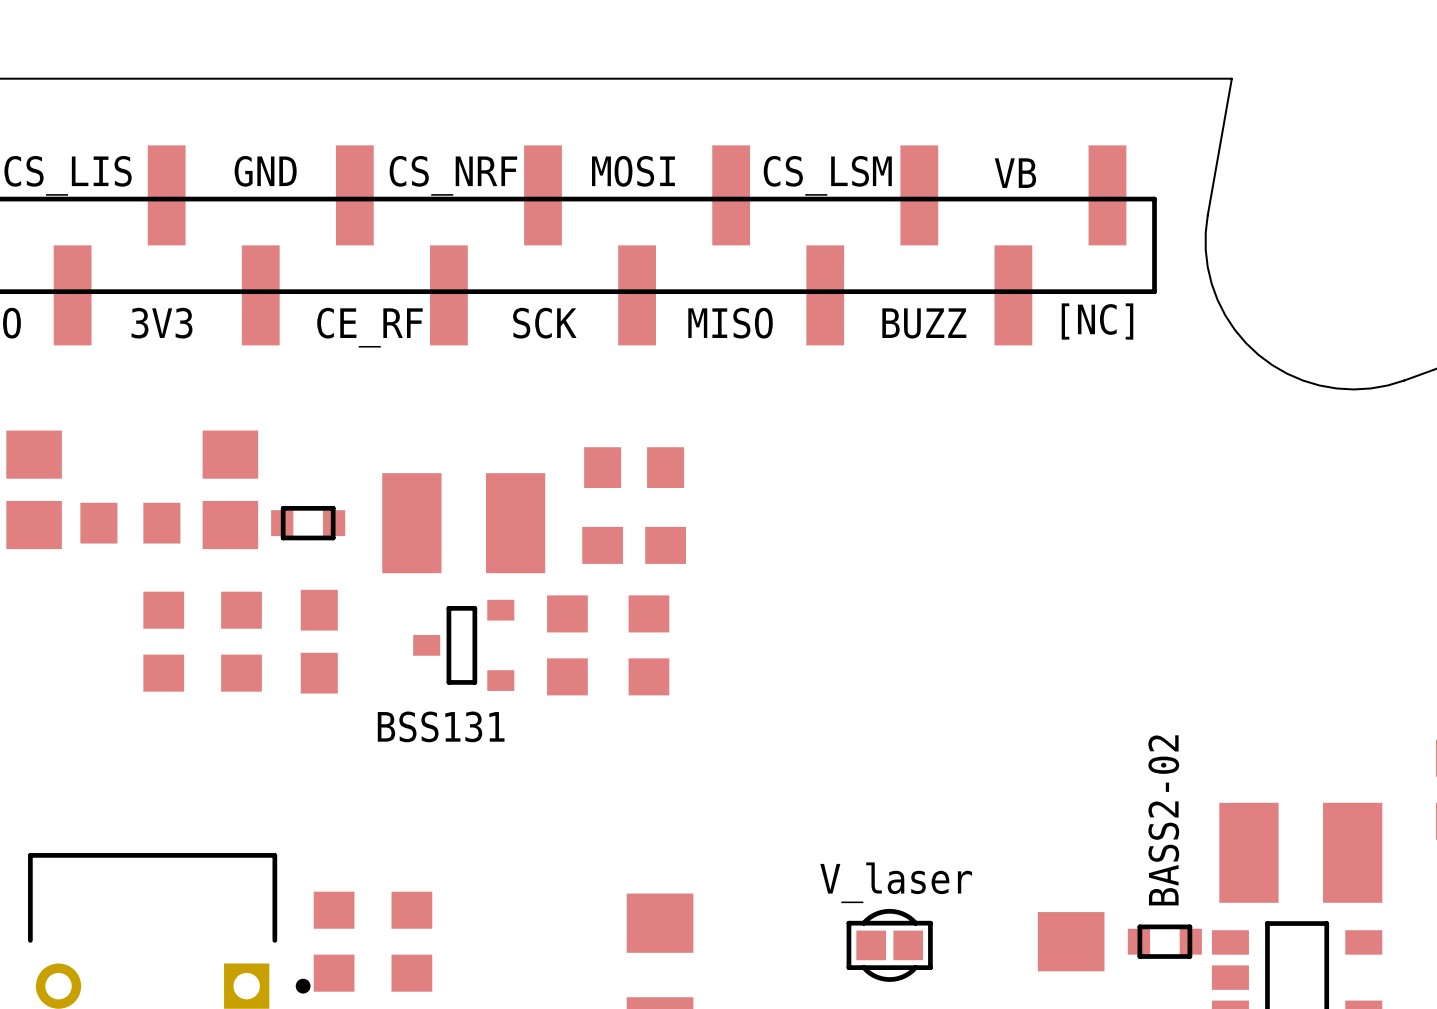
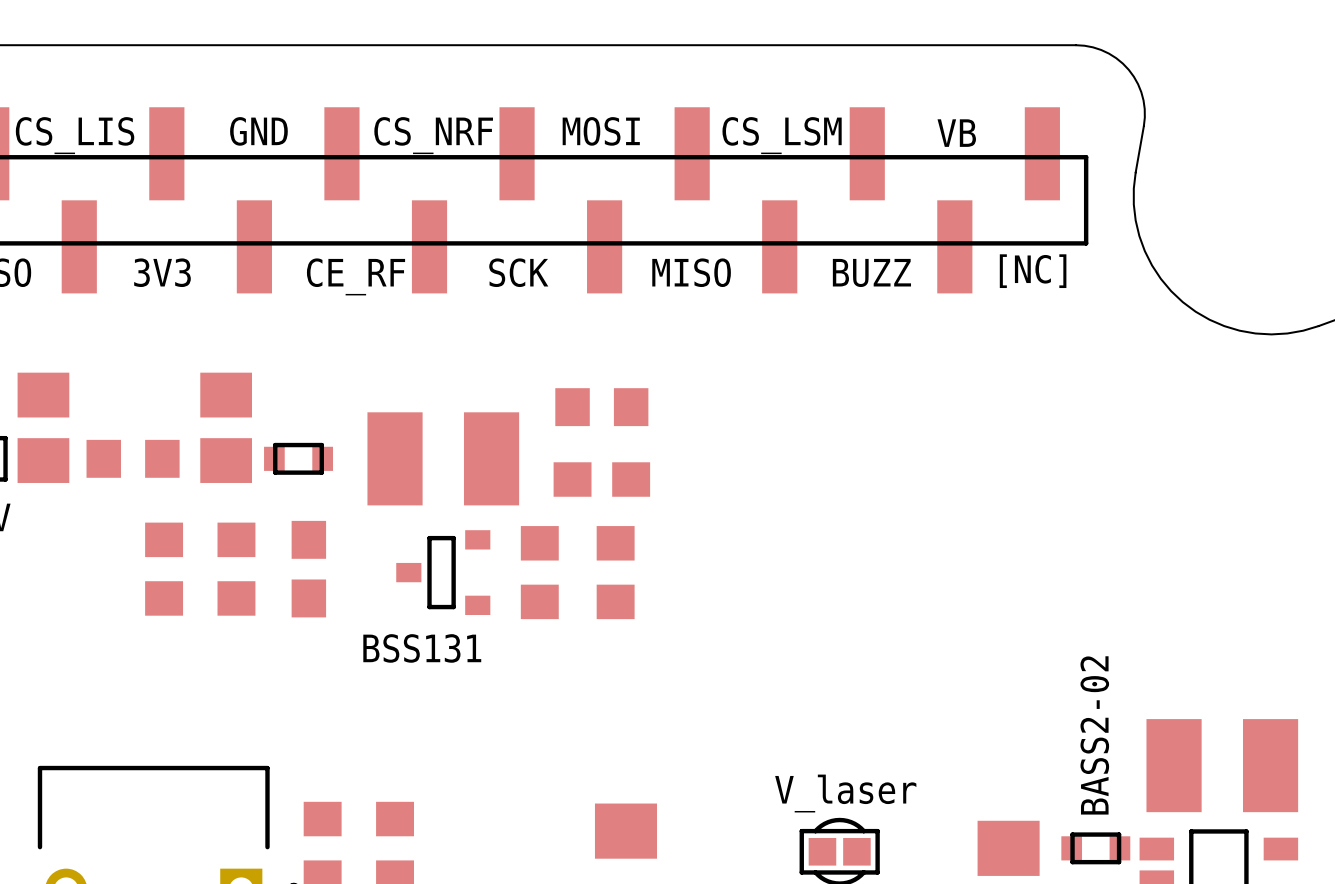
board edge: (1143, 78) (1231, 78) (1216, 165) -> (1075, 45) (1092, 47) (1108, 53) (1128, 69) (1141, 92) (1144, 108) (1143, 126)

